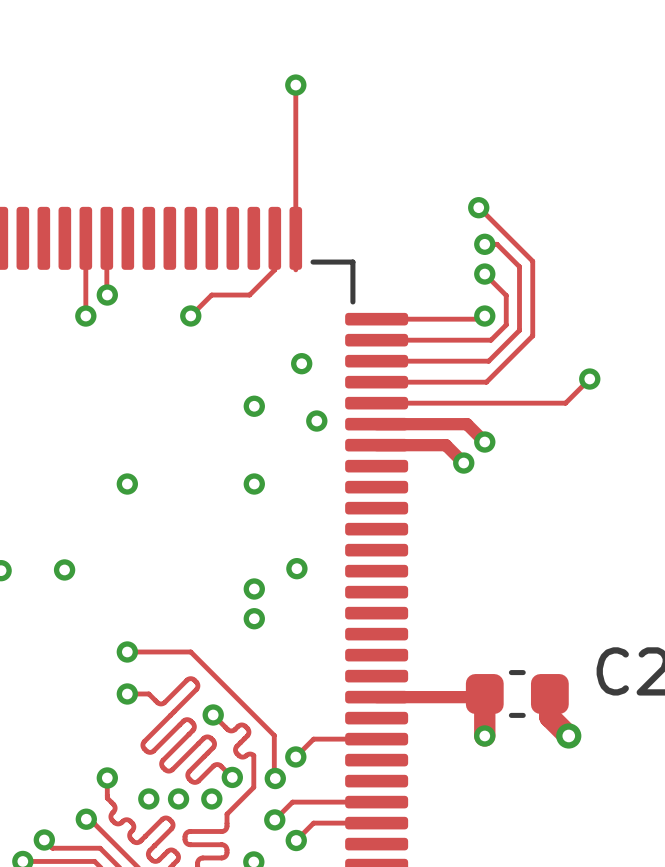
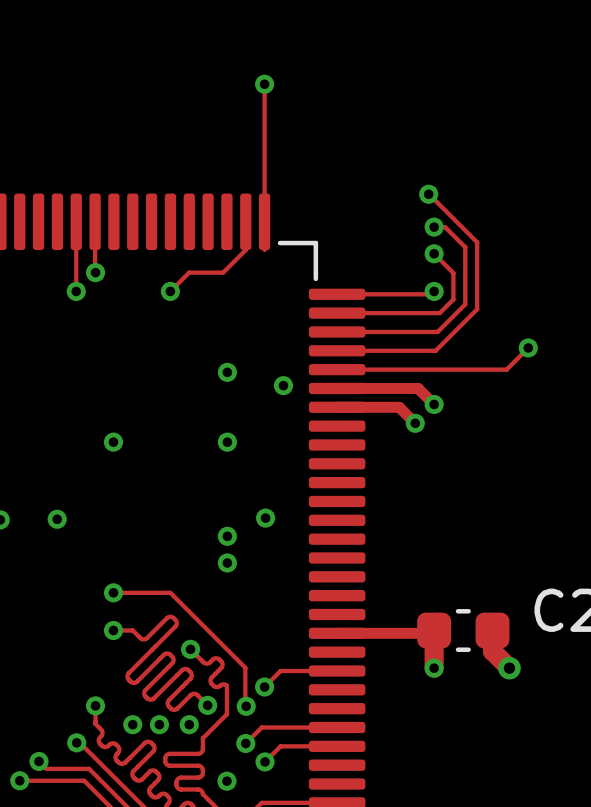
via: (301, 363) -> none

